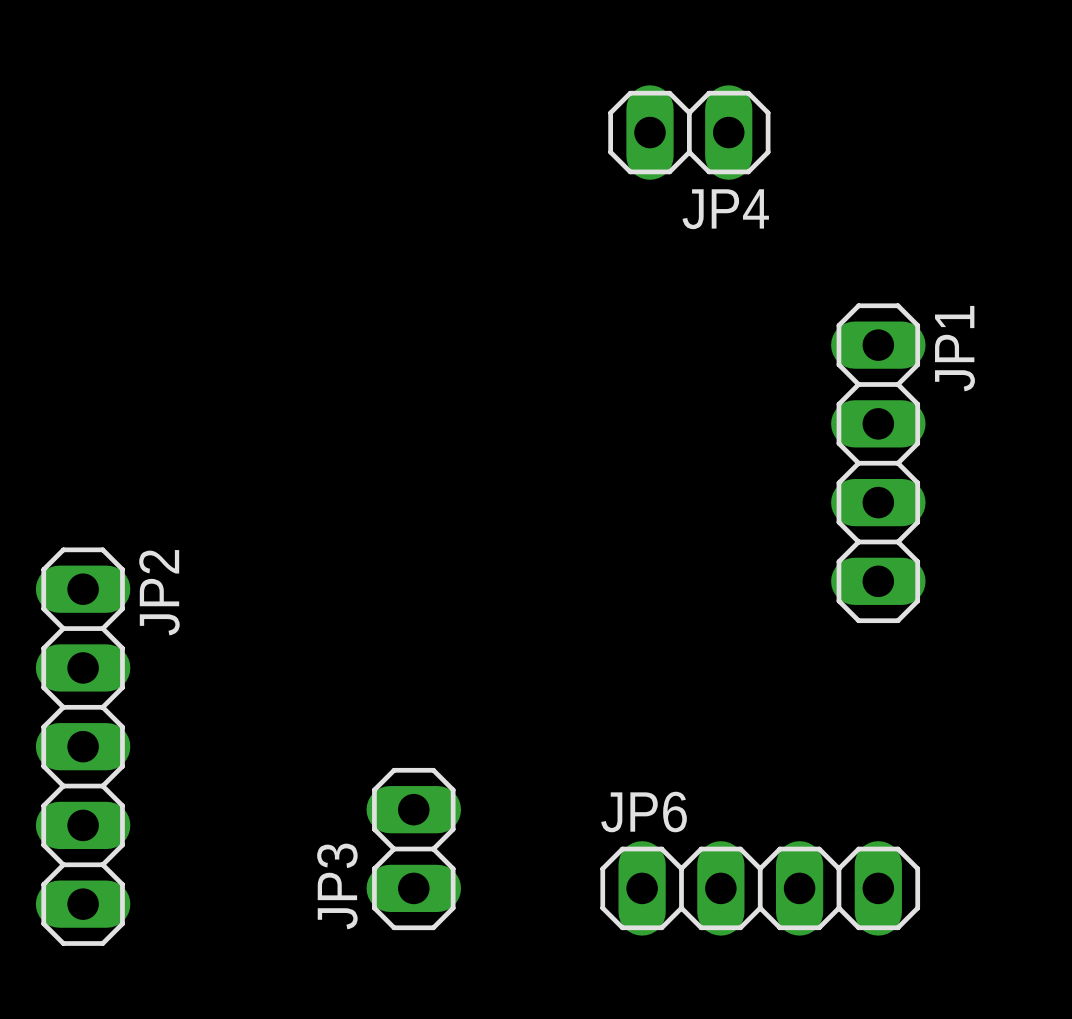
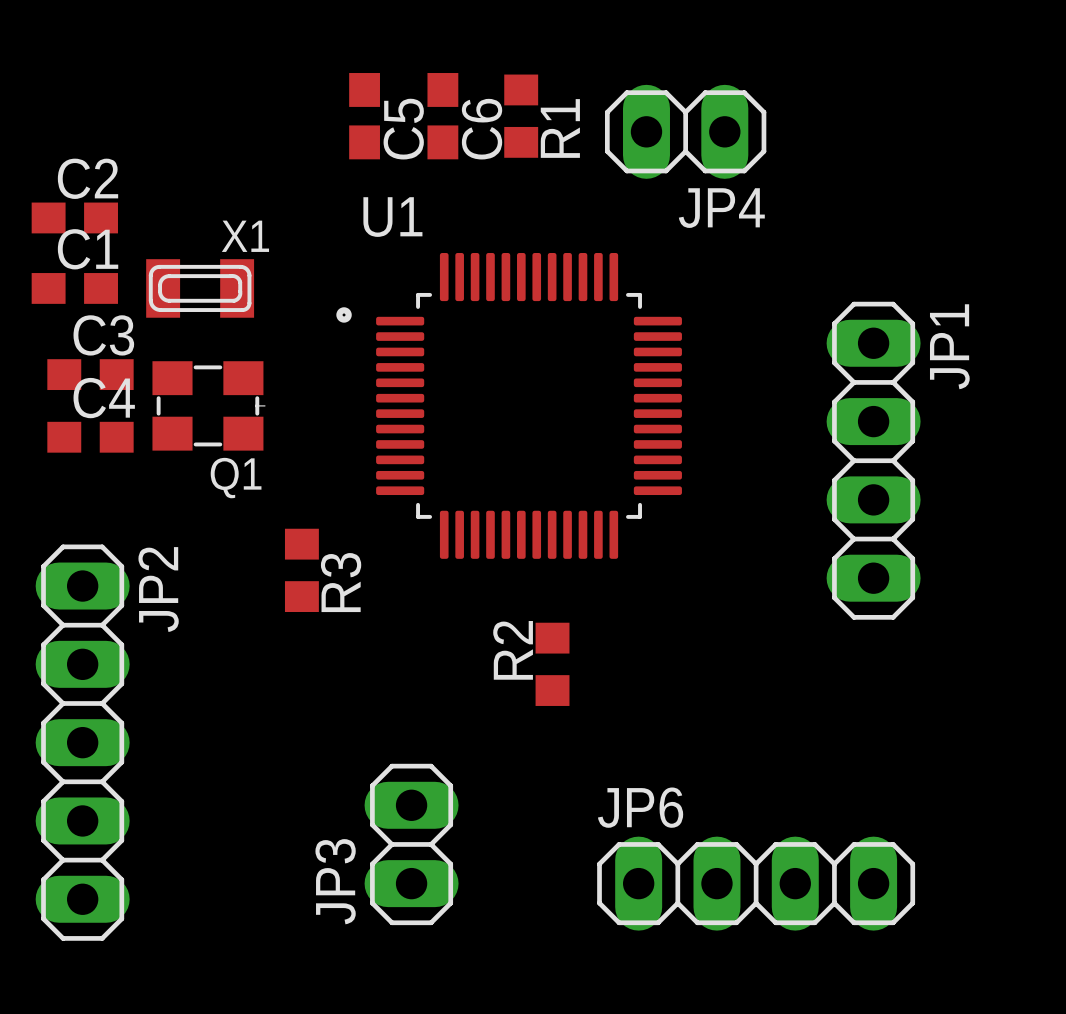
C5: none -> (364, 116)
C6: none -> (442, 116)
R1: none -> (521, 116)
C2: none -> (74, 217)
C1: none -> (74, 288)
X1: none -> (200, 288)
C3: none -> (90, 374)
Q1: none -> (208, 405)
U1: none -> (509, 405)
C4: none -> (90, 437)
R3: none -> (301, 570)
R2: none -> (552, 664)

